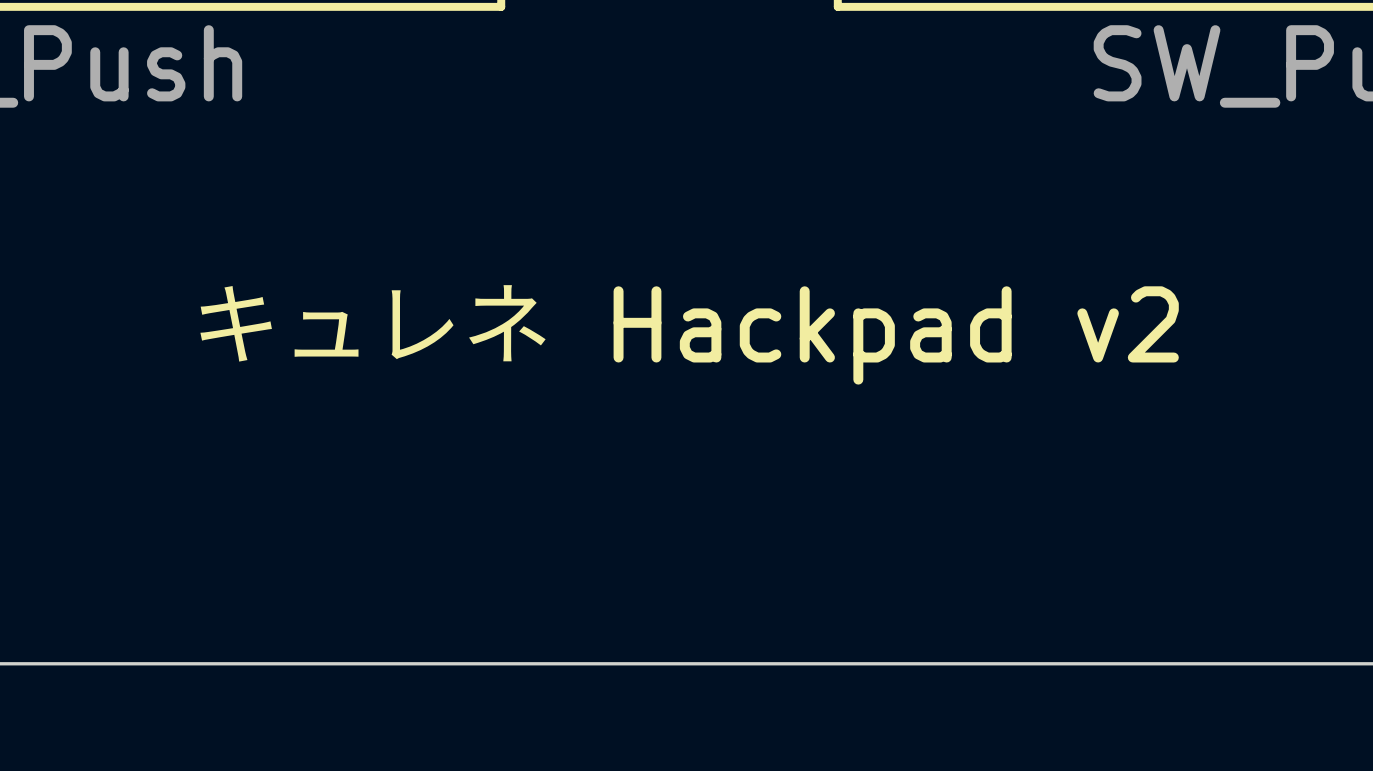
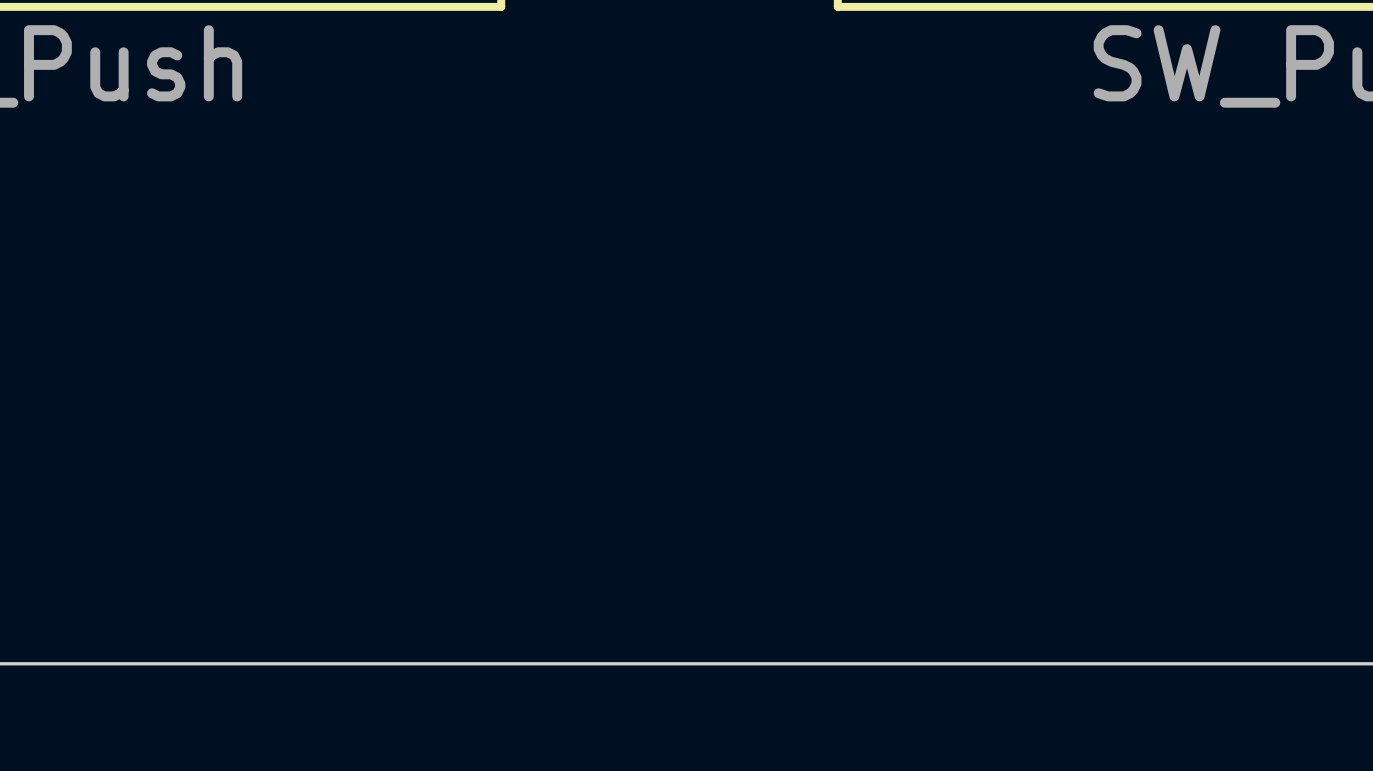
text: キュレネ Hackpad v2 (687, 332) -> none

